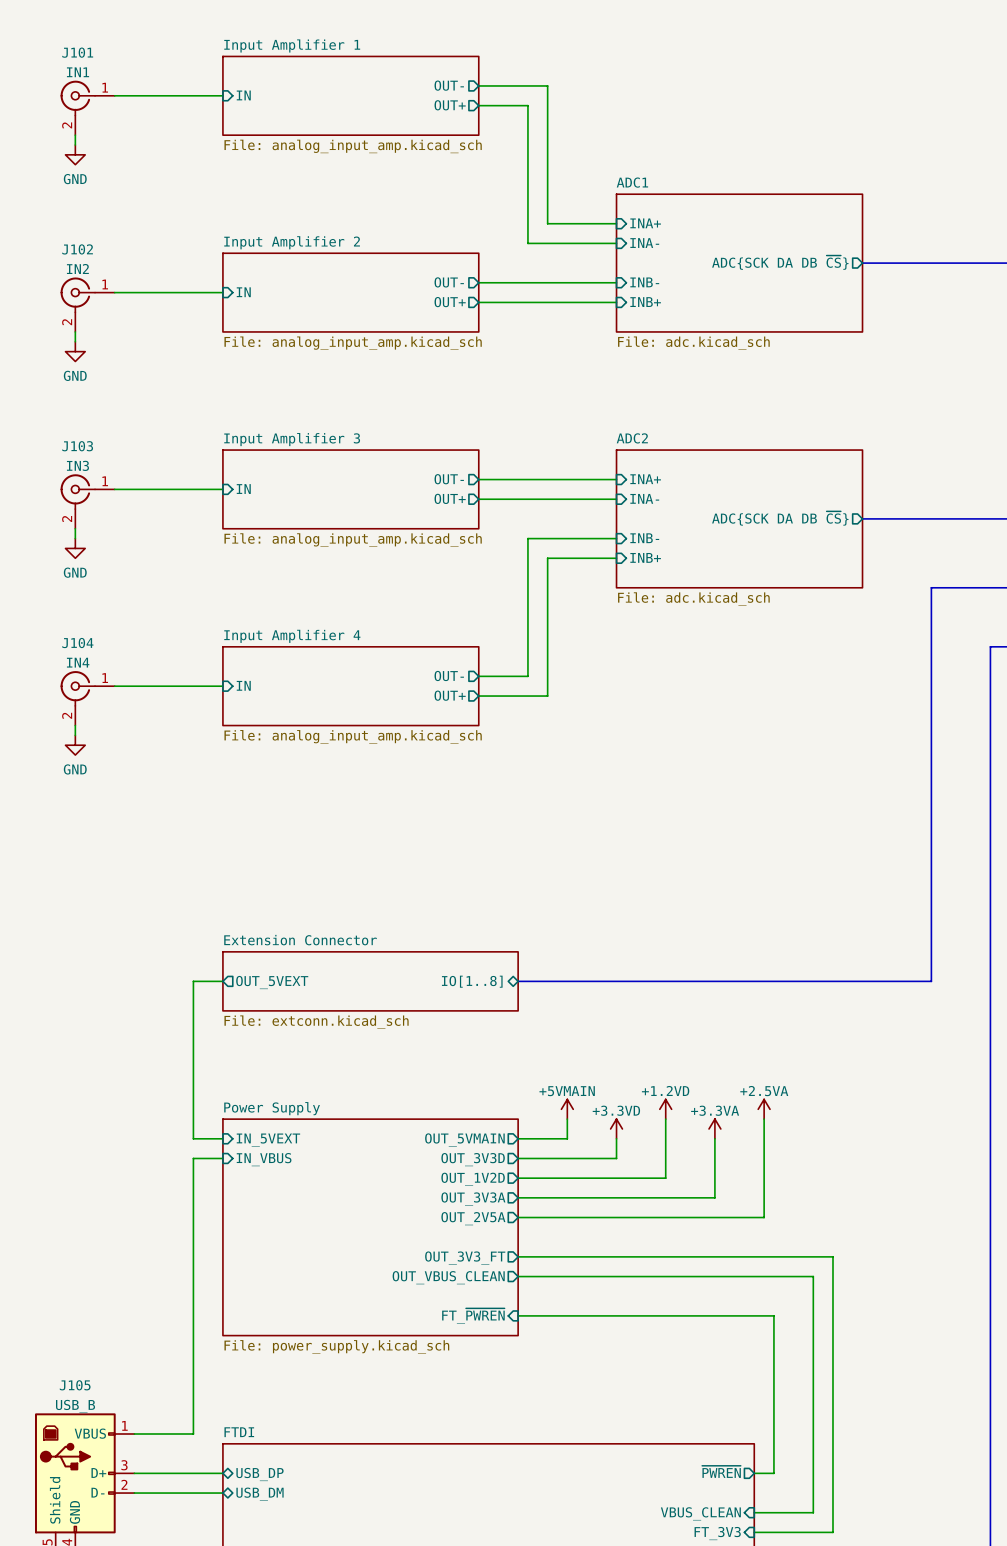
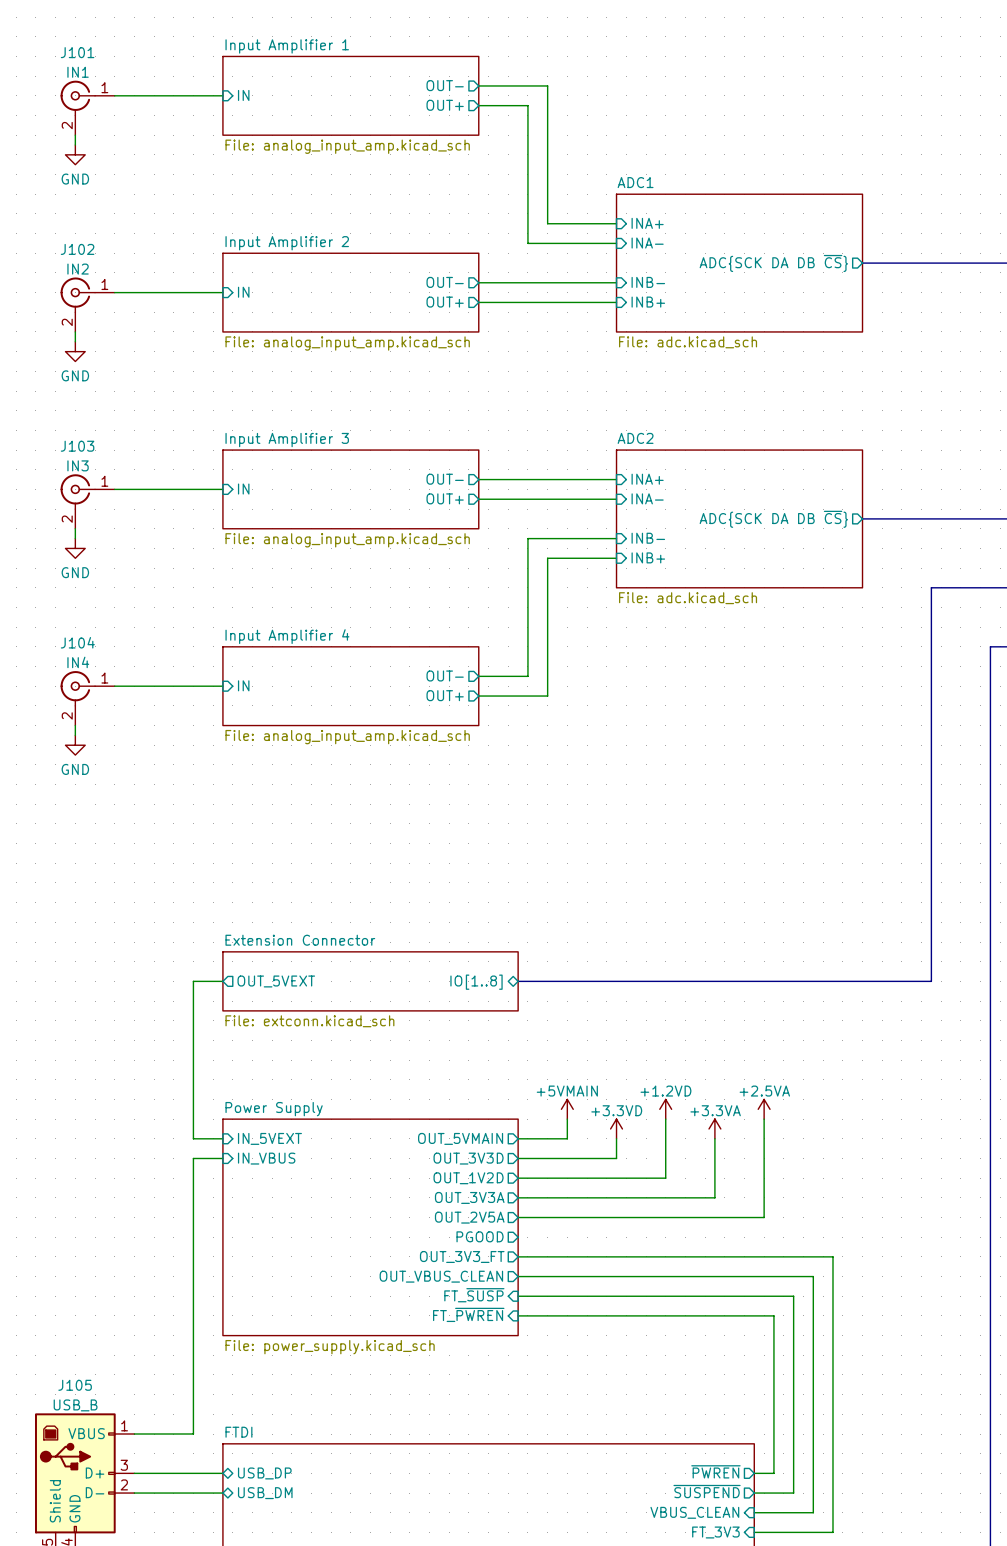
sheet pin: none -> PGOOD (480, 1236)
sheet pin: none -> FT_~{SUSP} (474, 1295)
wire: none -> (518, 1296) (793, 1296) (793, 1493) (754, 1493)
sheet pin: none -> ~{SUSPEND} (707, 1491)

